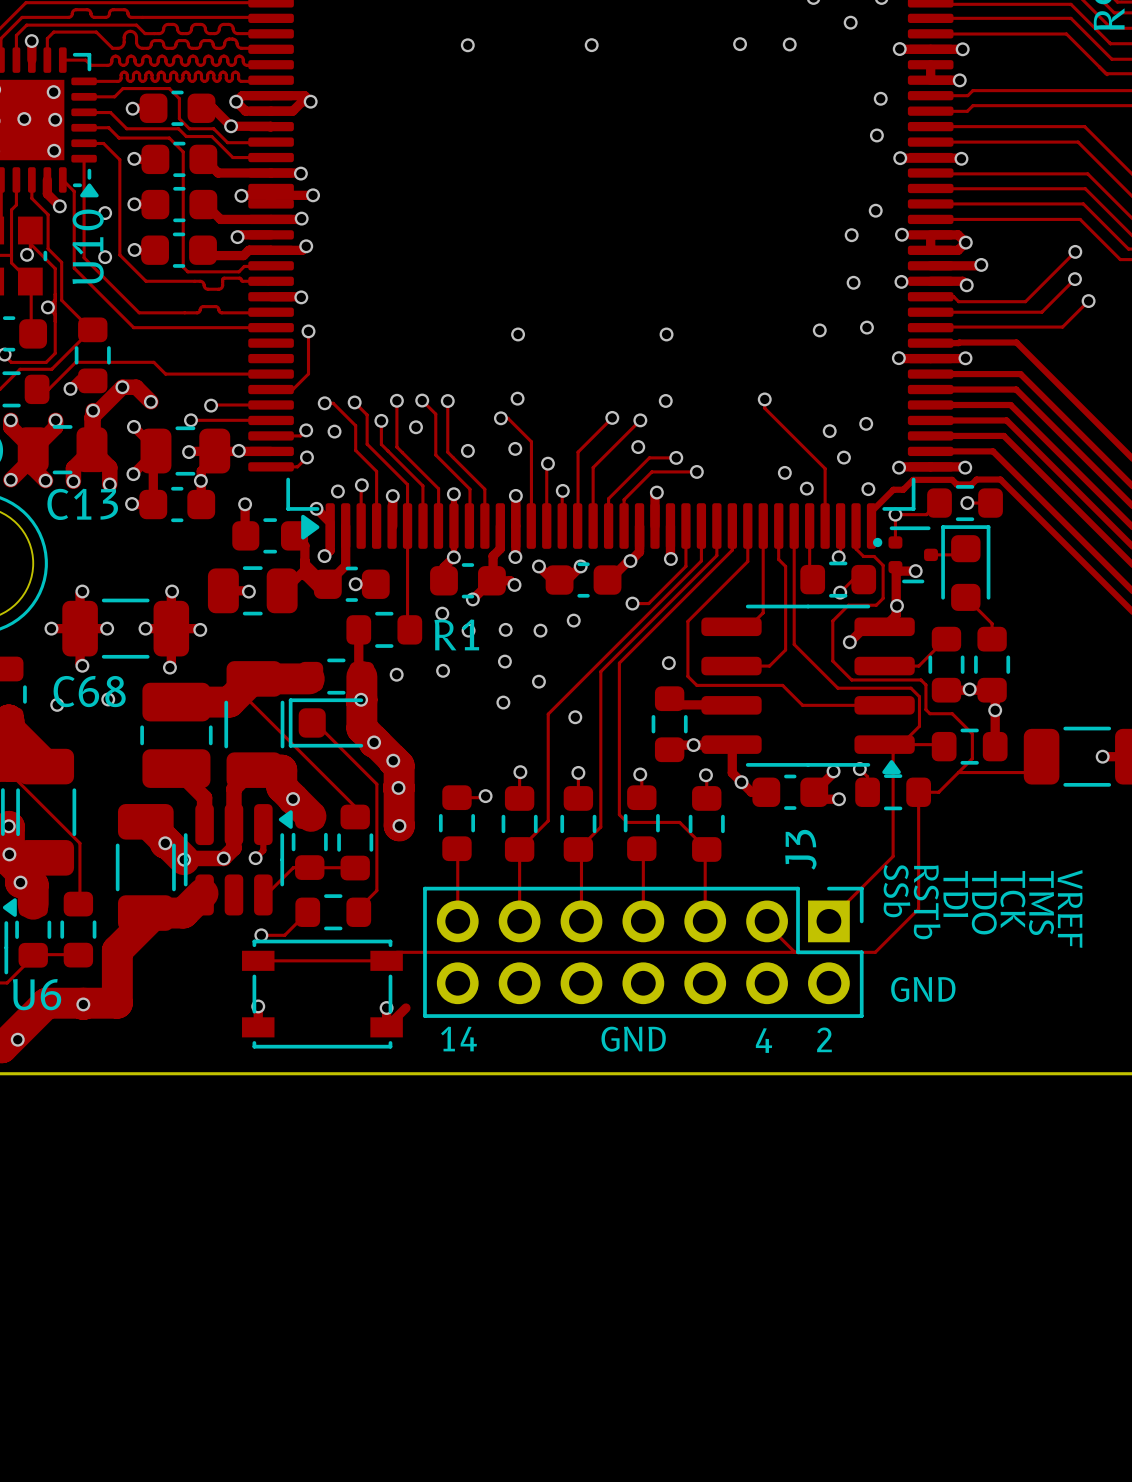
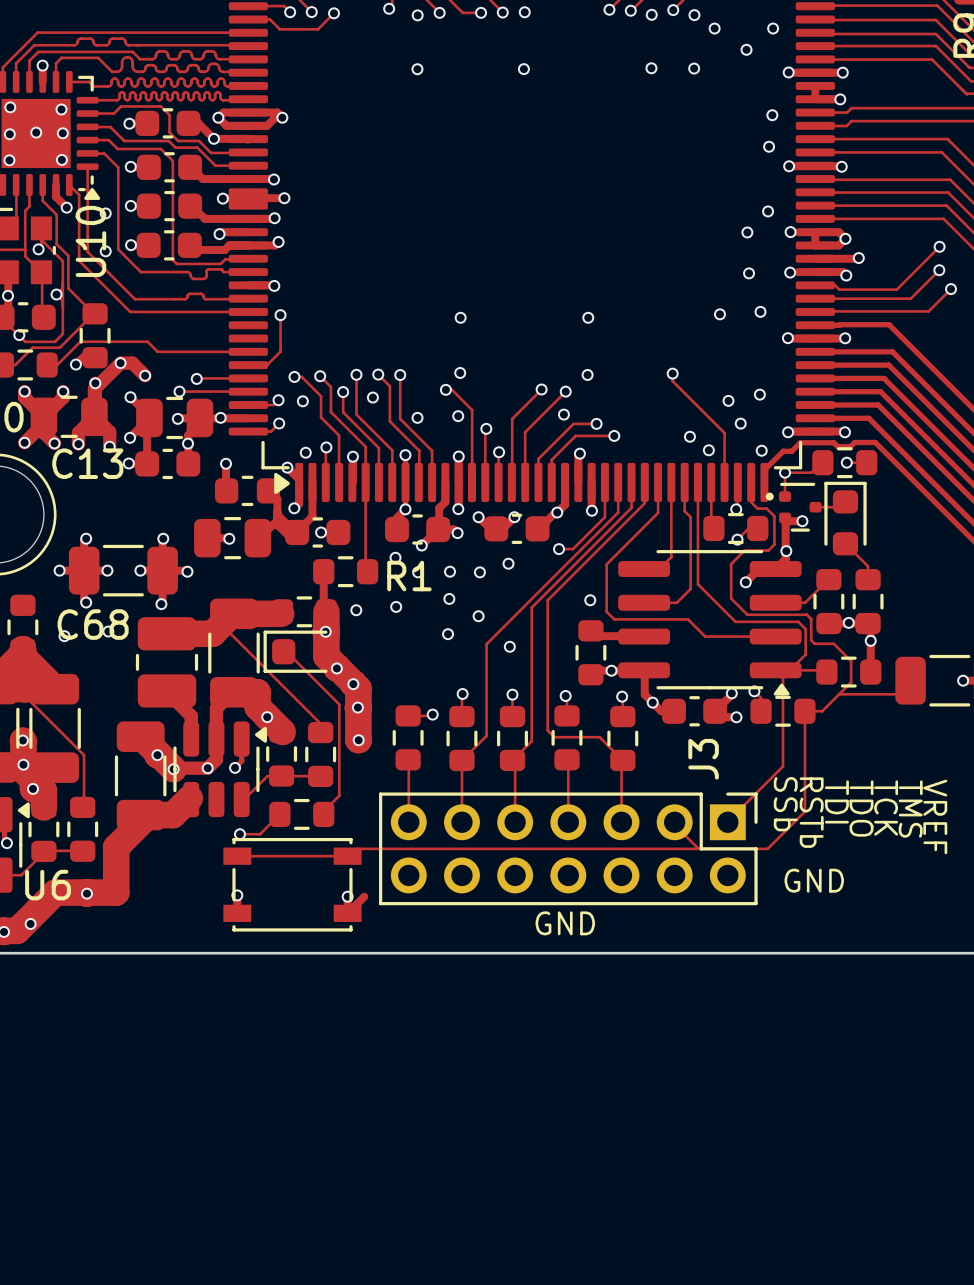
text: 14 (458, 1039) -> none
text: 2 (824, 1039) -> none
text: 4 (764, 1040) -> none

